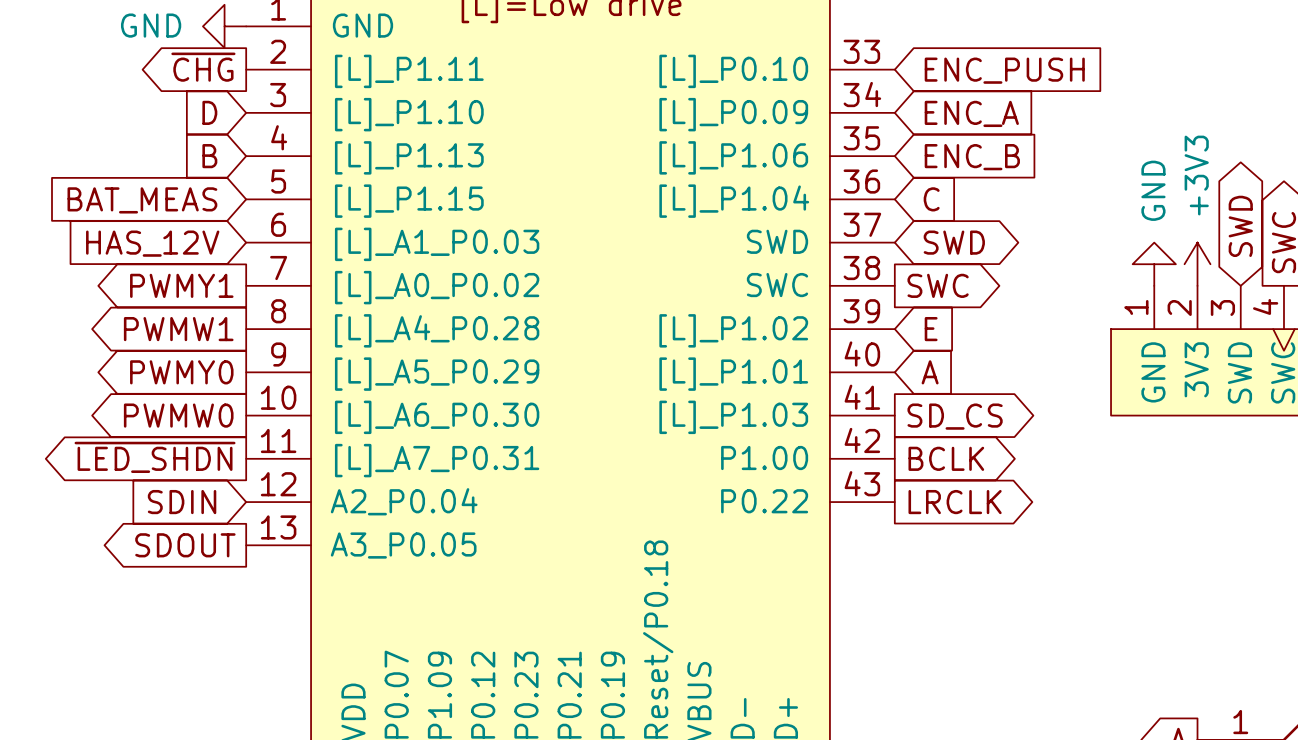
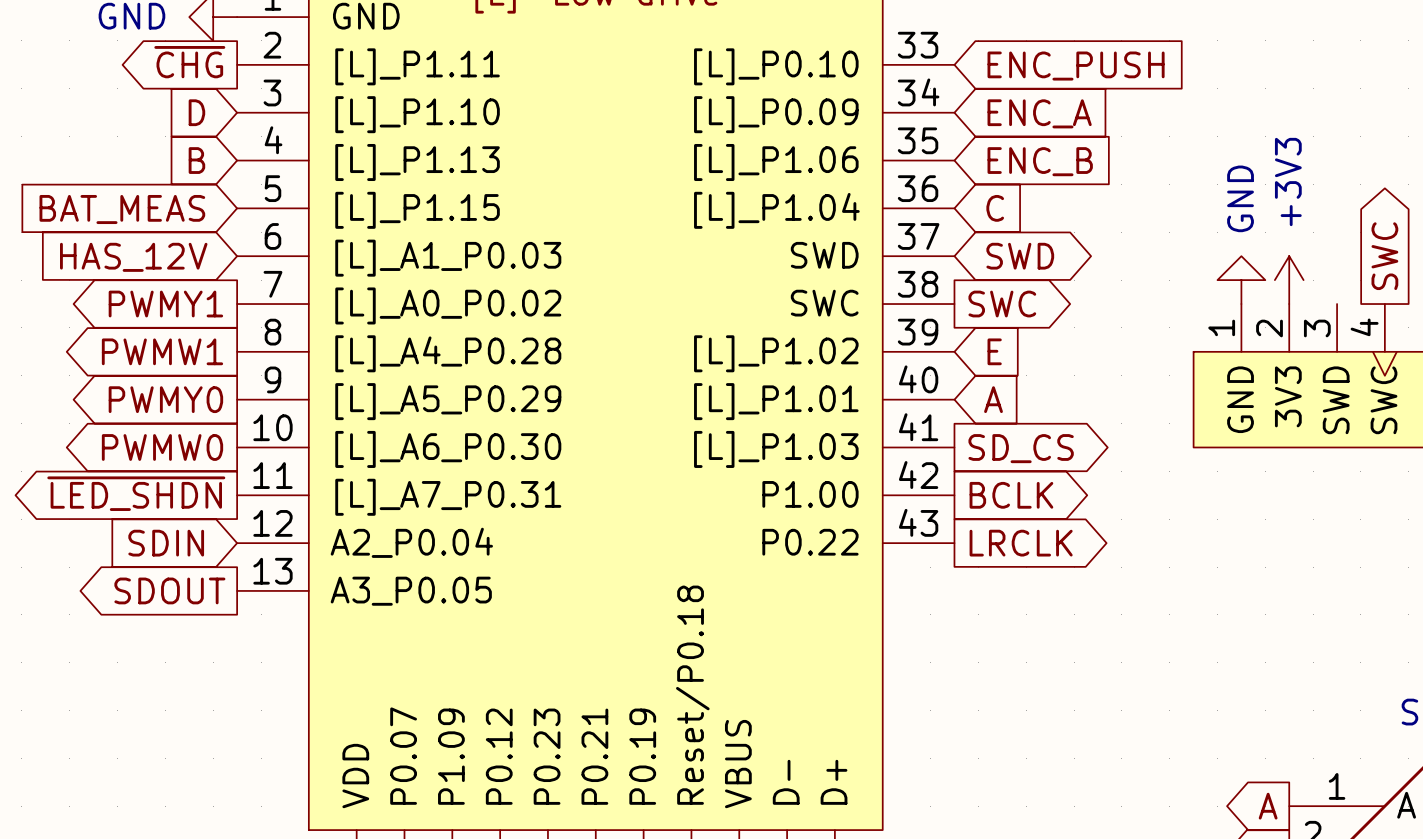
global label: SWD (1240, 226) -> none

